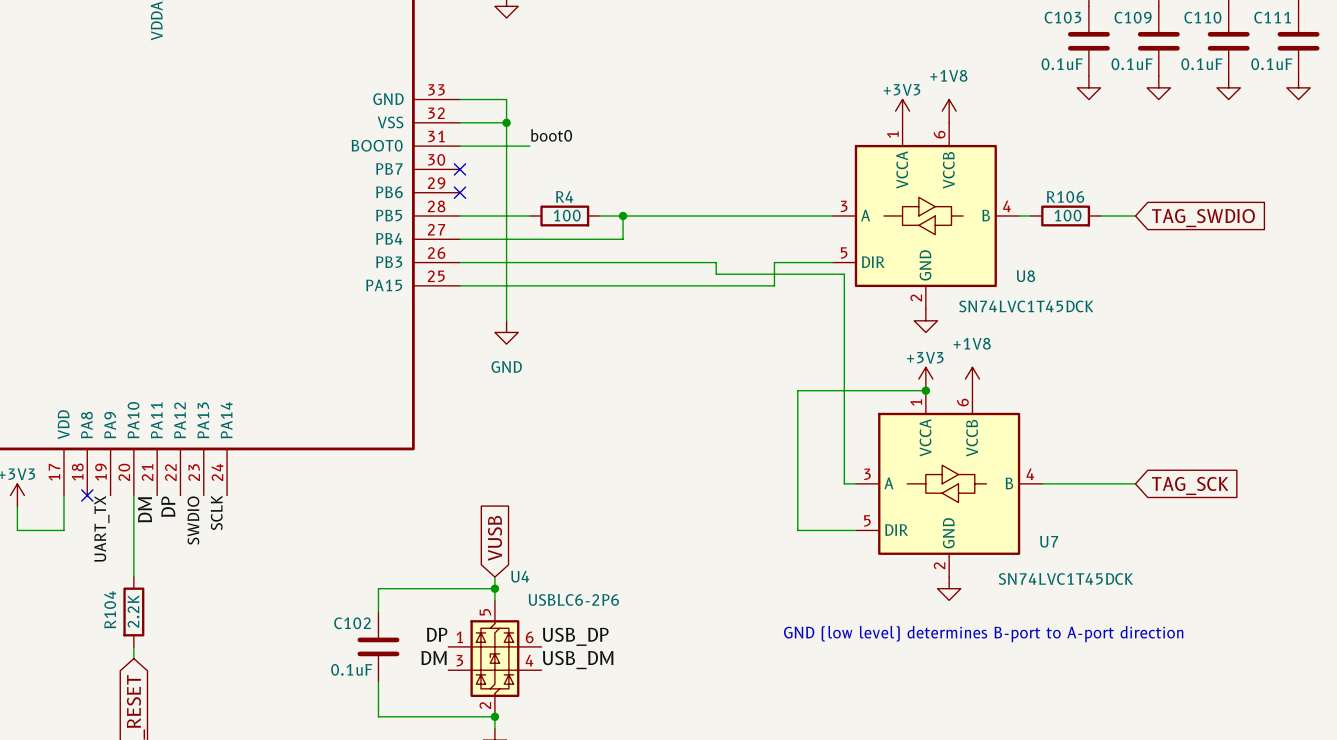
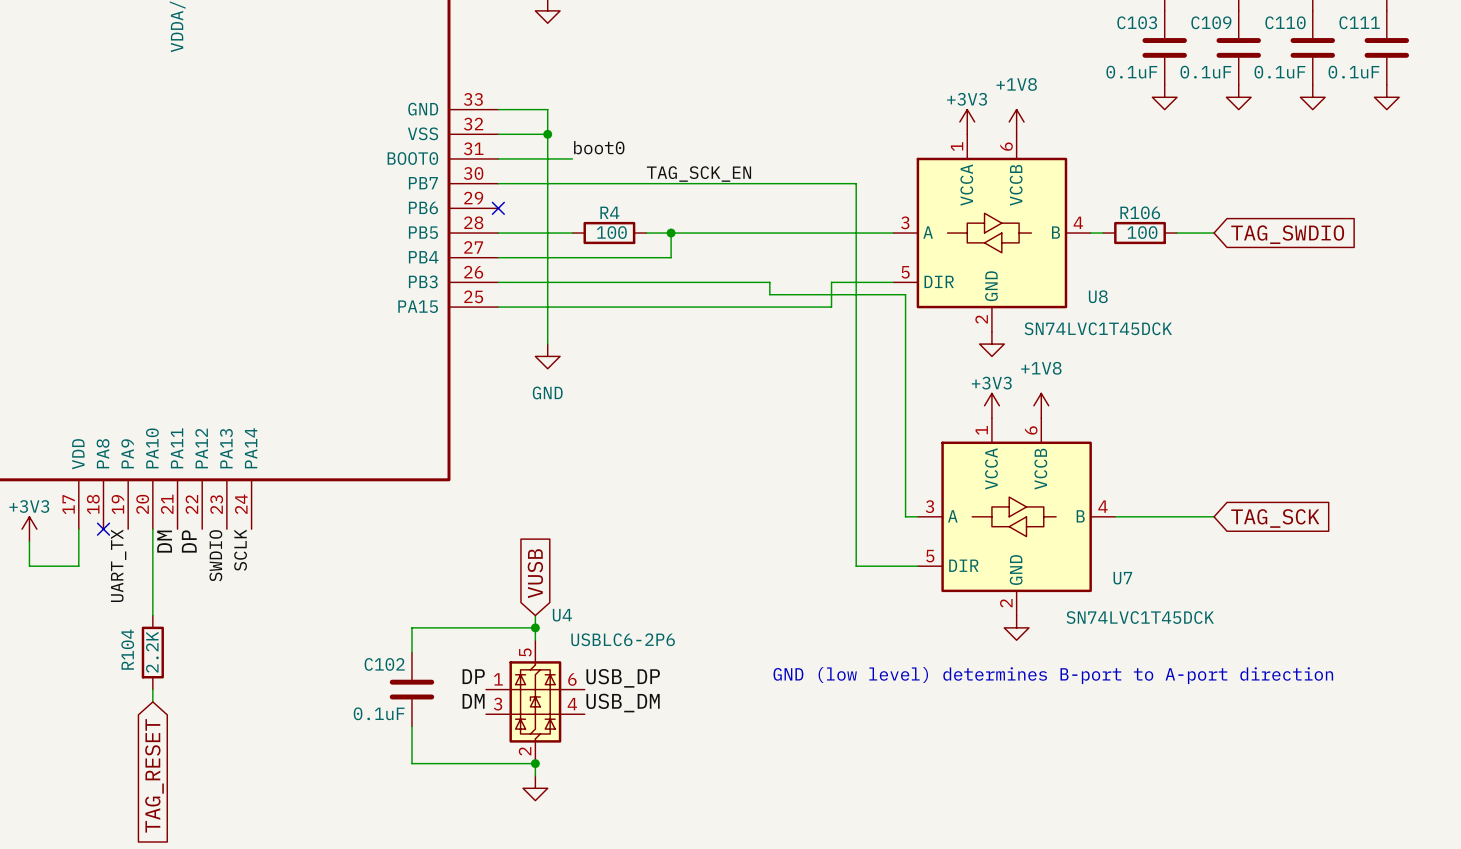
label: none -> TAG_SCK_EN (698, 174)
no-connect mark: (459, 169) -> none
wire: (797, 390) (925, 390) -> (856, 418) (856, 183) (498, 183)
junction: (925, 390) -> none

